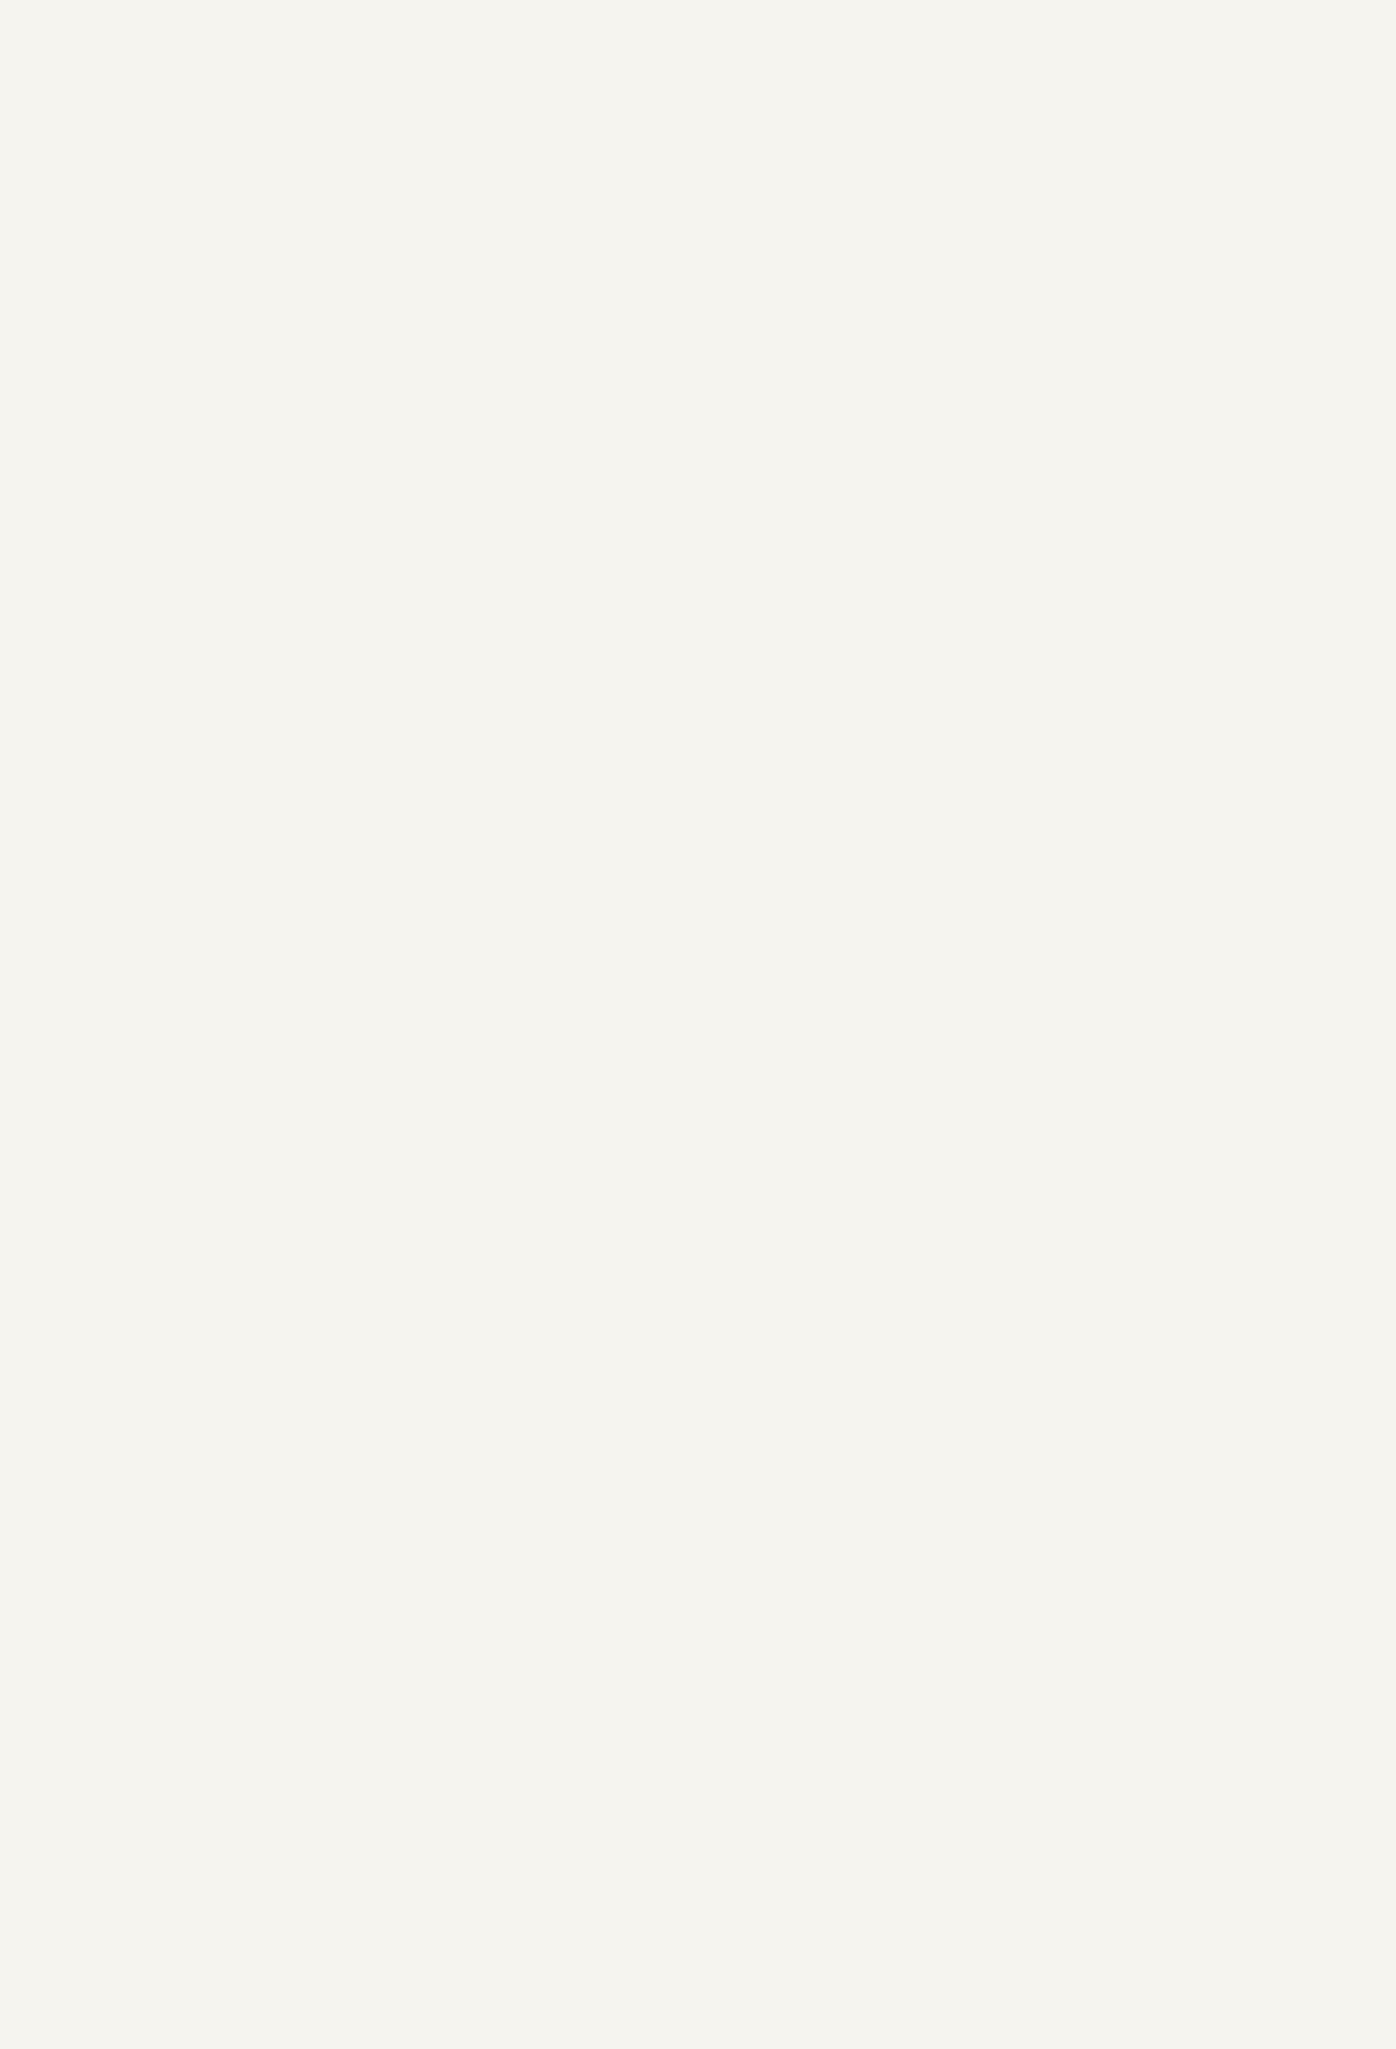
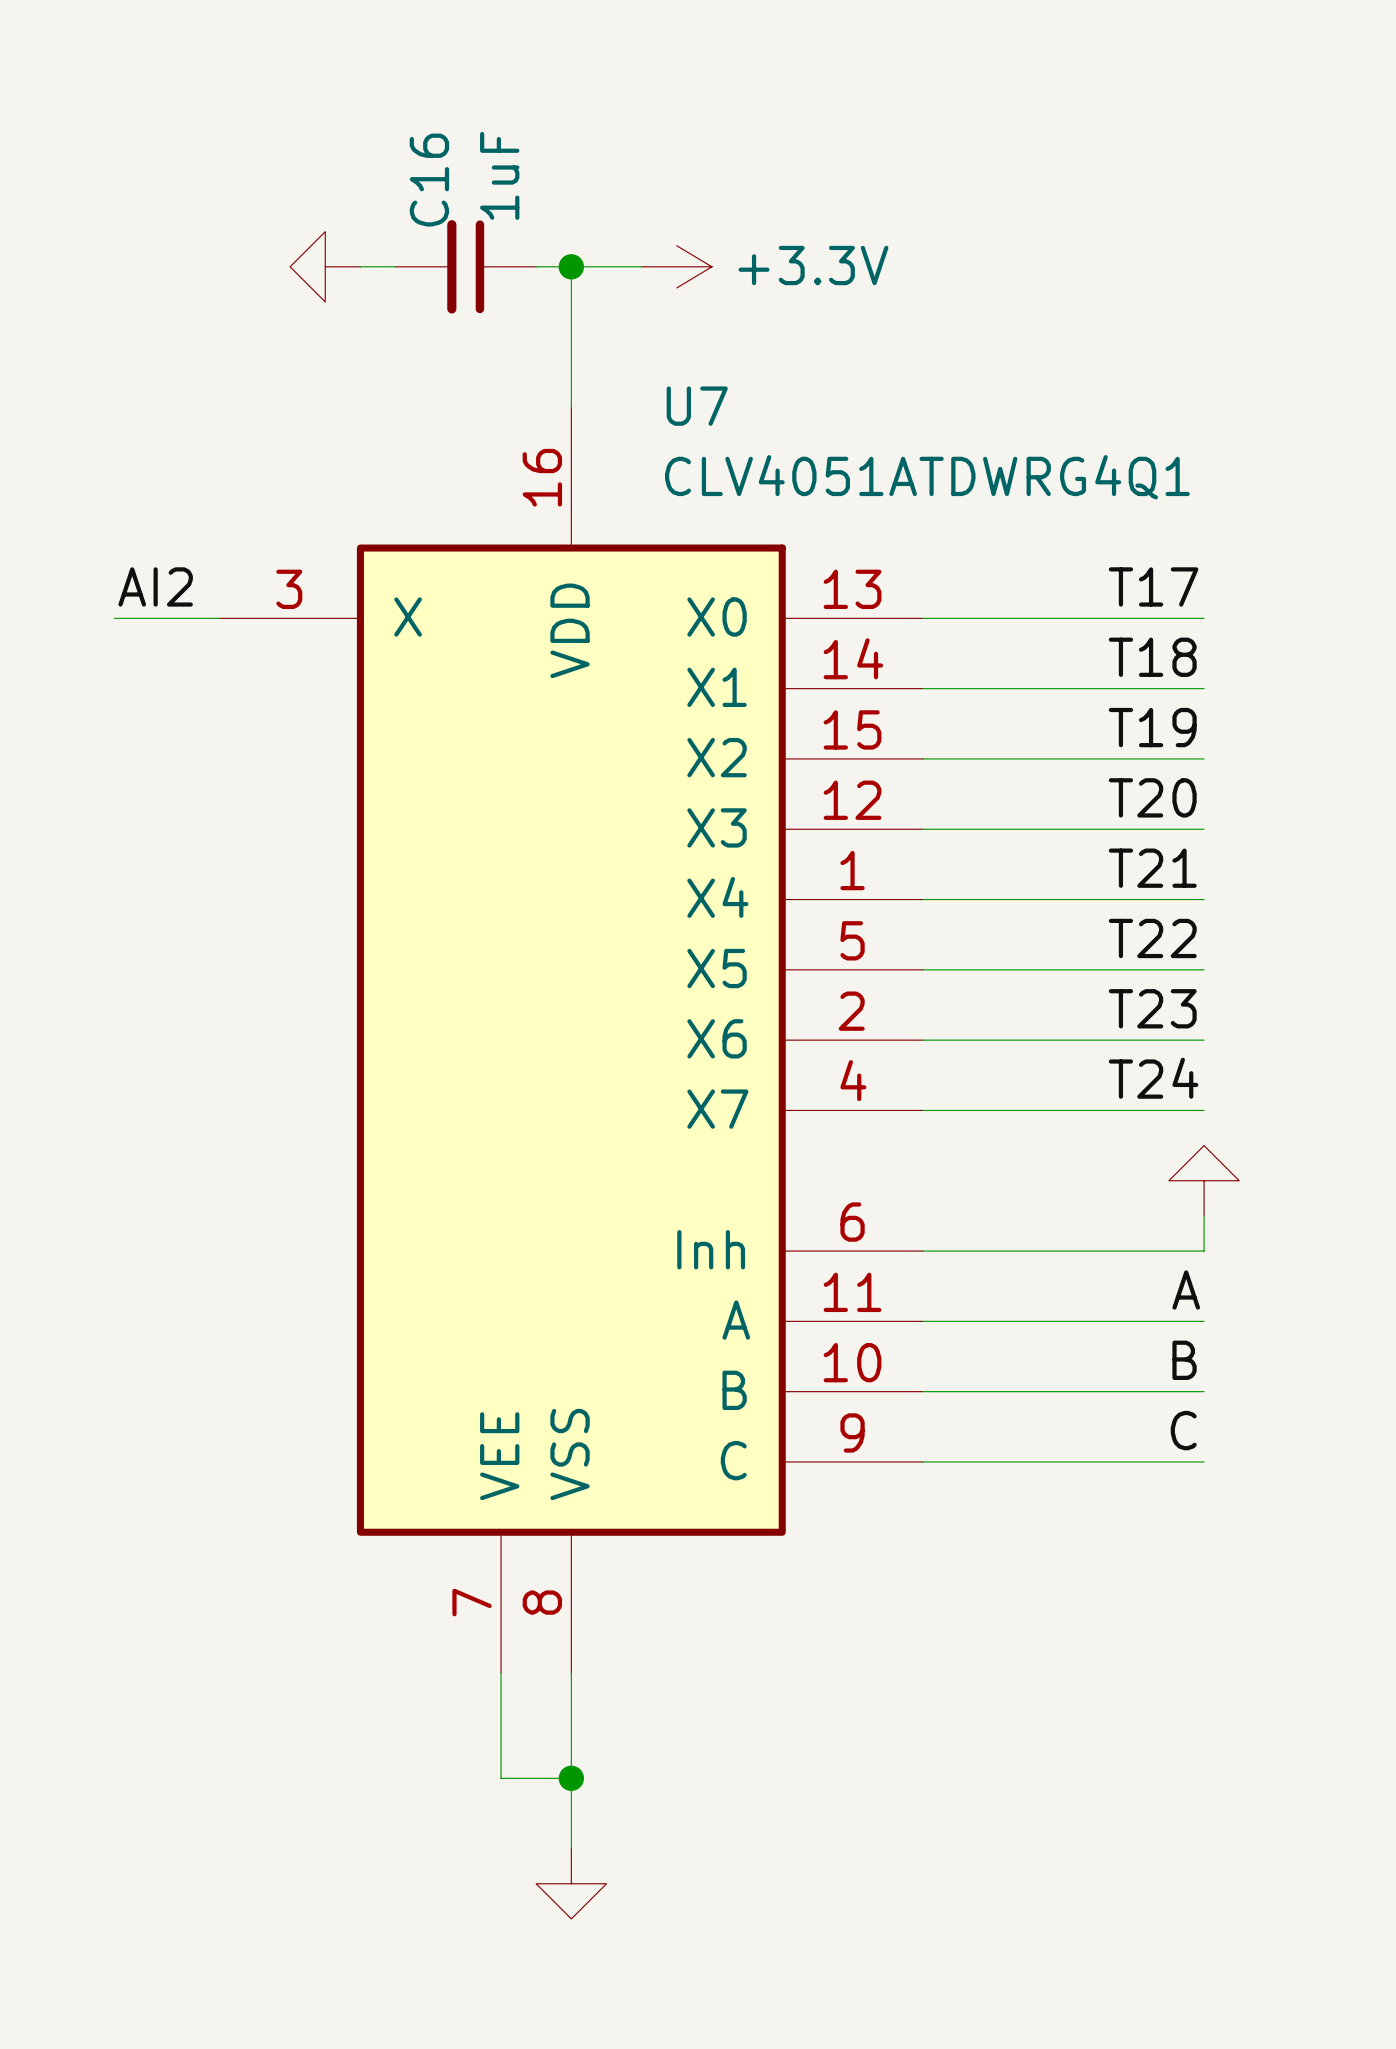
power symbol: none -> (325, 266)
wire: none -> (360, 266) (395, 266)
C16: none -> 1uF (465, 266)
wire: none -> (536, 266) (641, 266)
wire: none -> (571, 266) (571, 407)
junction: none -> (571, 266)
power symbol: none -> +3.3V (676, 266)
label: none -> AI2 (155, 586)
label: none -> T17 (1153, 586)
wire: none -> (114, 618) (219, 618)
wire: none -> (922, 618) (1204, 618)
label: none -> T18 (1152, 657)
wire: none -> (922, 688) (1204, 688)
label: none -> T19 (1152, 727)
wire: none -> (922, 758) (1204, 758)
label: none -> T20 (1152, 797)
wire: none -> (922, 829) (1204, 829)
label: none -> T21 (1152, 868)
wire: none -> (922, 899) (1204, 899)
label: none -> T22 (1152, 938)
wire: none -> (922, 969) (1204, 969)
label: none -> T23 (1152, 1008)
U7: none -> CLV4051ATDWRG4Q1 (571, 1040)
wire: none -> (922, 1040) (1204, 1040)
label: none -> T24 (1153, 1078)
wire: none -> (922, 1110) (1204, 1110)
power symbol: none -> (1204, 1180)
wire: none -> (1204, 1215) (1204, 1251) (922, 1251)
label: none -> A (1186, 1289)
wire: none -> (922, 1321) (1204, 1321)
label: none -> B (1184, 1360)
wire: none -> (922, 1391) (1204, 1391)
label: none -> C (1183, 1430)
wire: none -> (922, 1461) (1204, 1461)
wire: none -> (501, 1672) (501, 1778) (571, 1778)
wire: none -> (571, 1672) (571, 1848)
junction: none -> (571, 1778)
power symbol: none -> (571, 1883)

